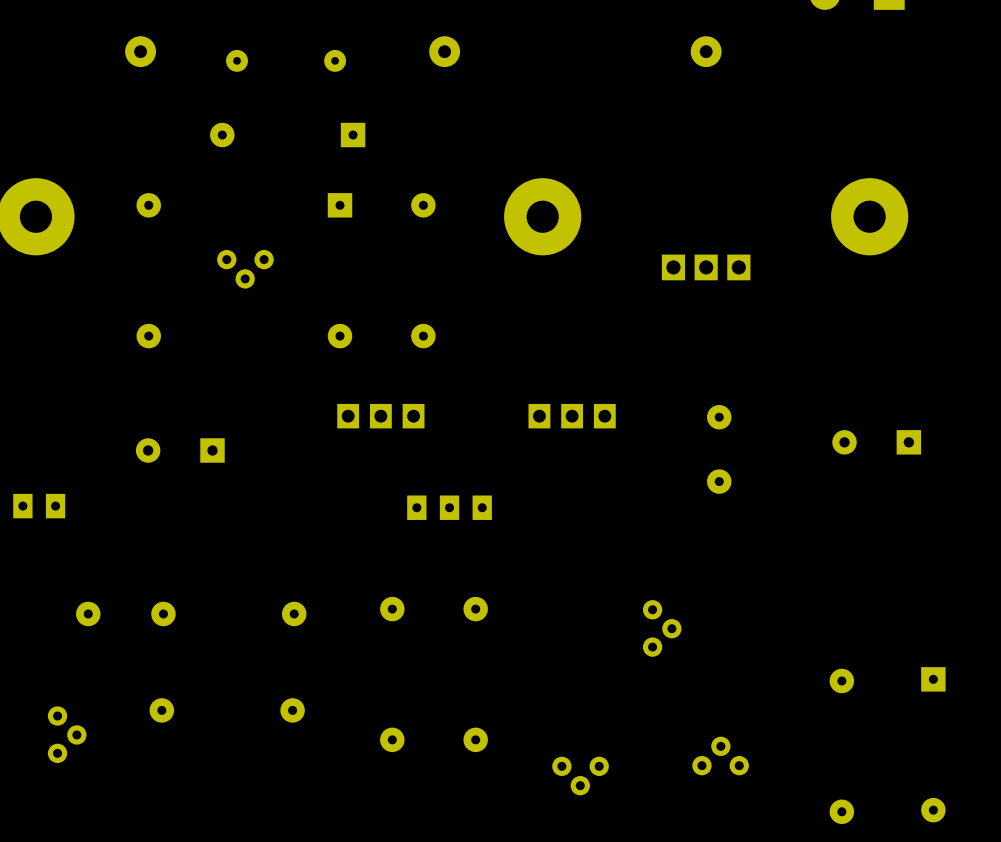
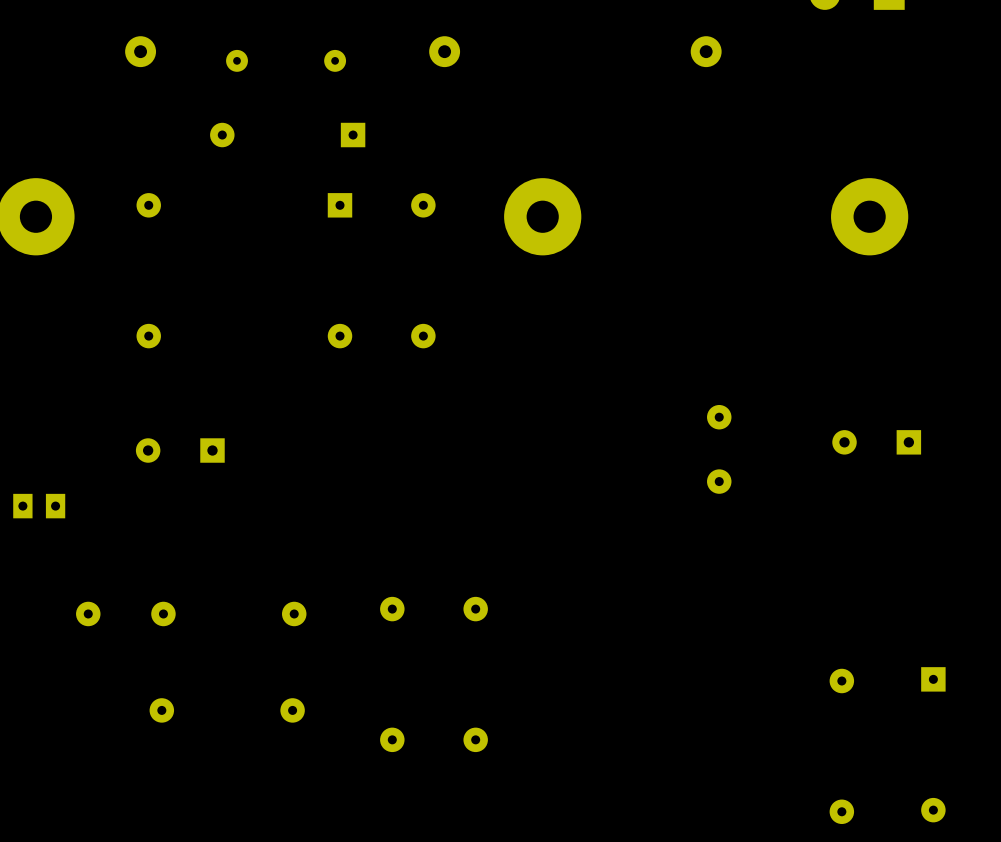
part: (706, 267) -> none
part: (245, 269) -> none
part: (380, 416) -> none
part: (572, 416) -> none
part: (449, 507) -> none
part: (662, 628) -> none
part: (67, 734) -> none
part: (720, 756) -> none
part: (580, 776) -> none

